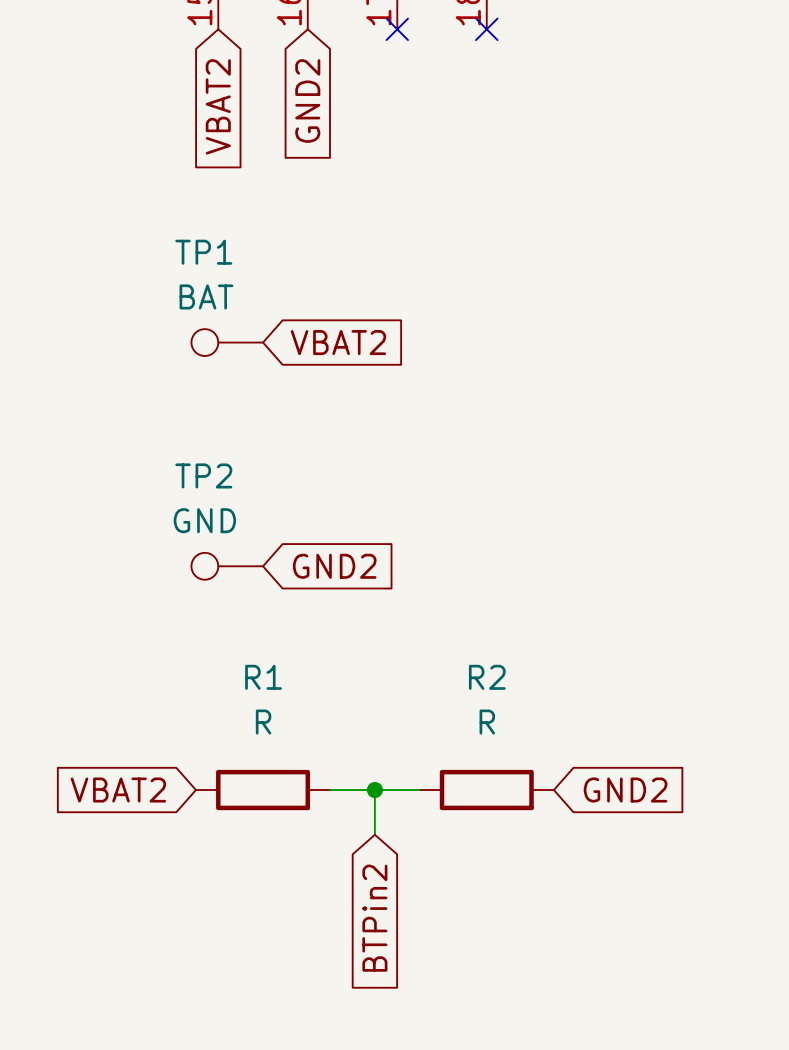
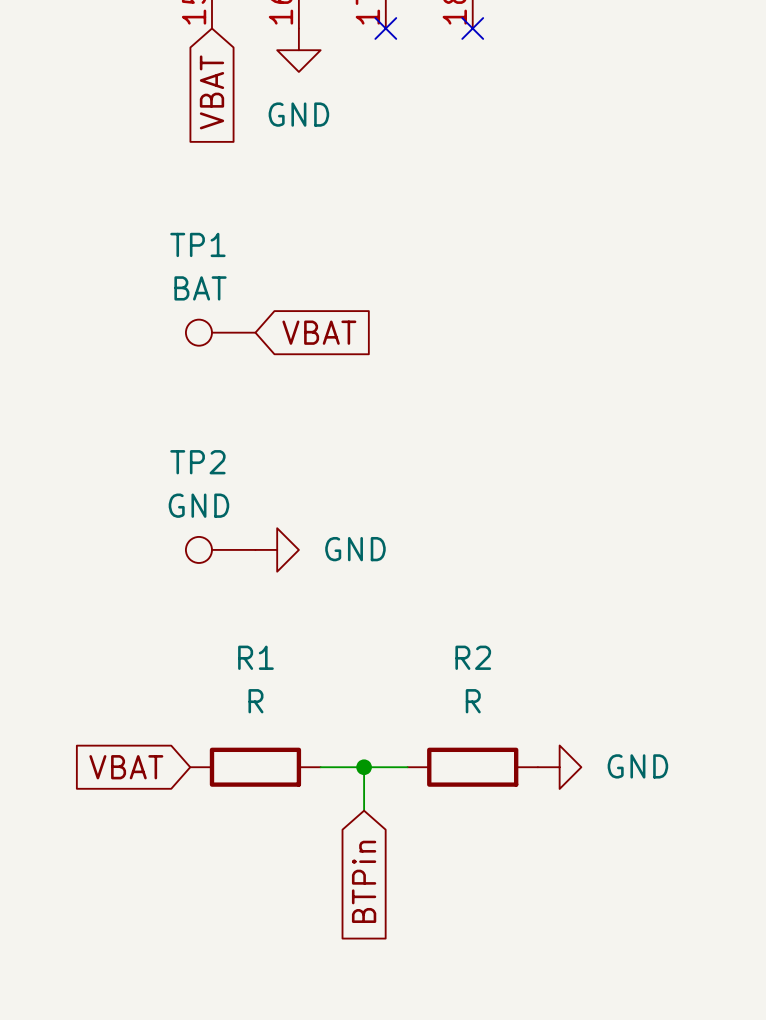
power symbol: none -> GND (298, 50)
global label: GND2 (307, 101) -> none
global label: VBAT2 (218, 106) -> VBAT (211, 92)
global label: VBAT2 (338, 342) -> VBAT (319, 332)
power symbol: none -> GND (277, 549)
global label: GND2 (334, 566) -> none
global label: VBAT2 (118, 790) -> VBAT (126, 767)
power symbol: none -> GND (559, 767)
global label: GND2 (625, 790) -> none
global label: BTPin2 (374, 918) -> BTPin (364, 881)

